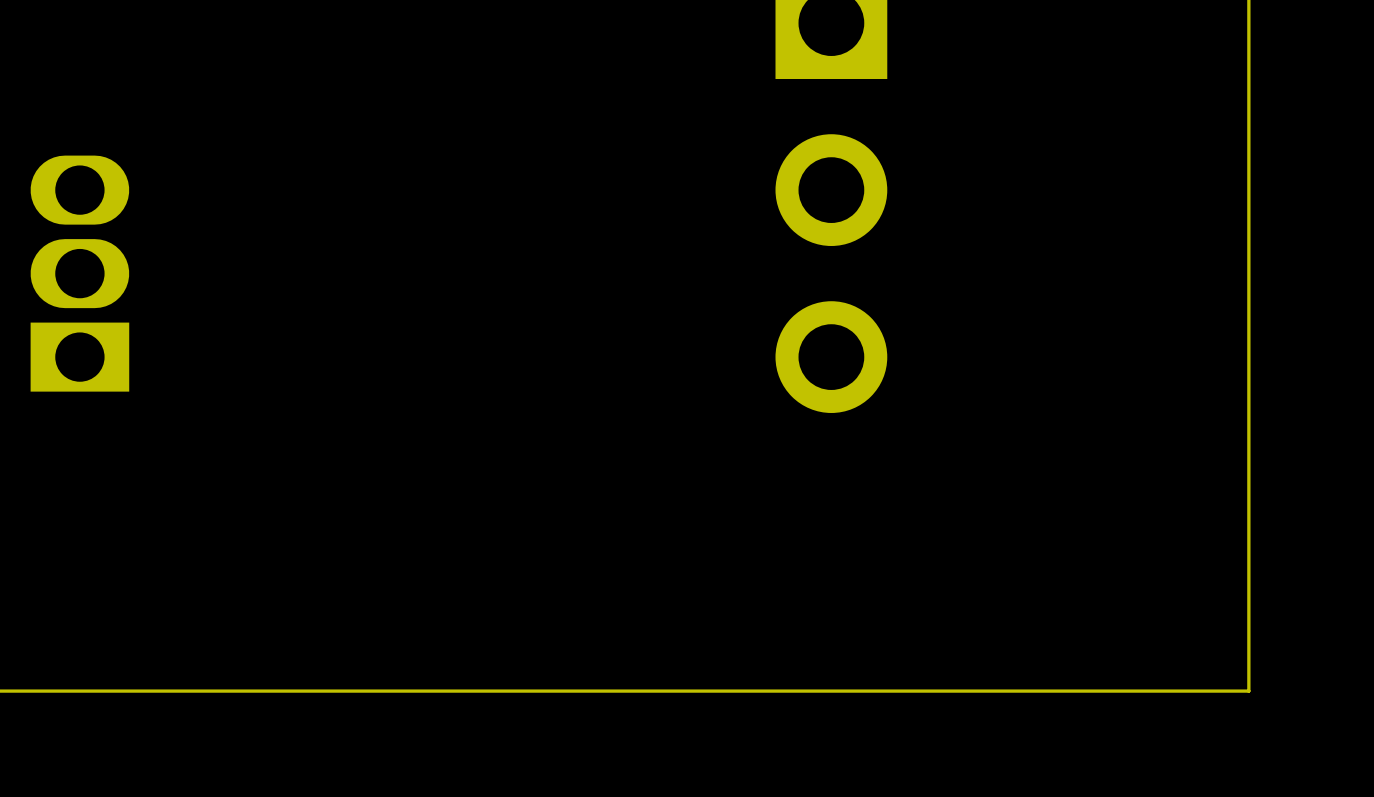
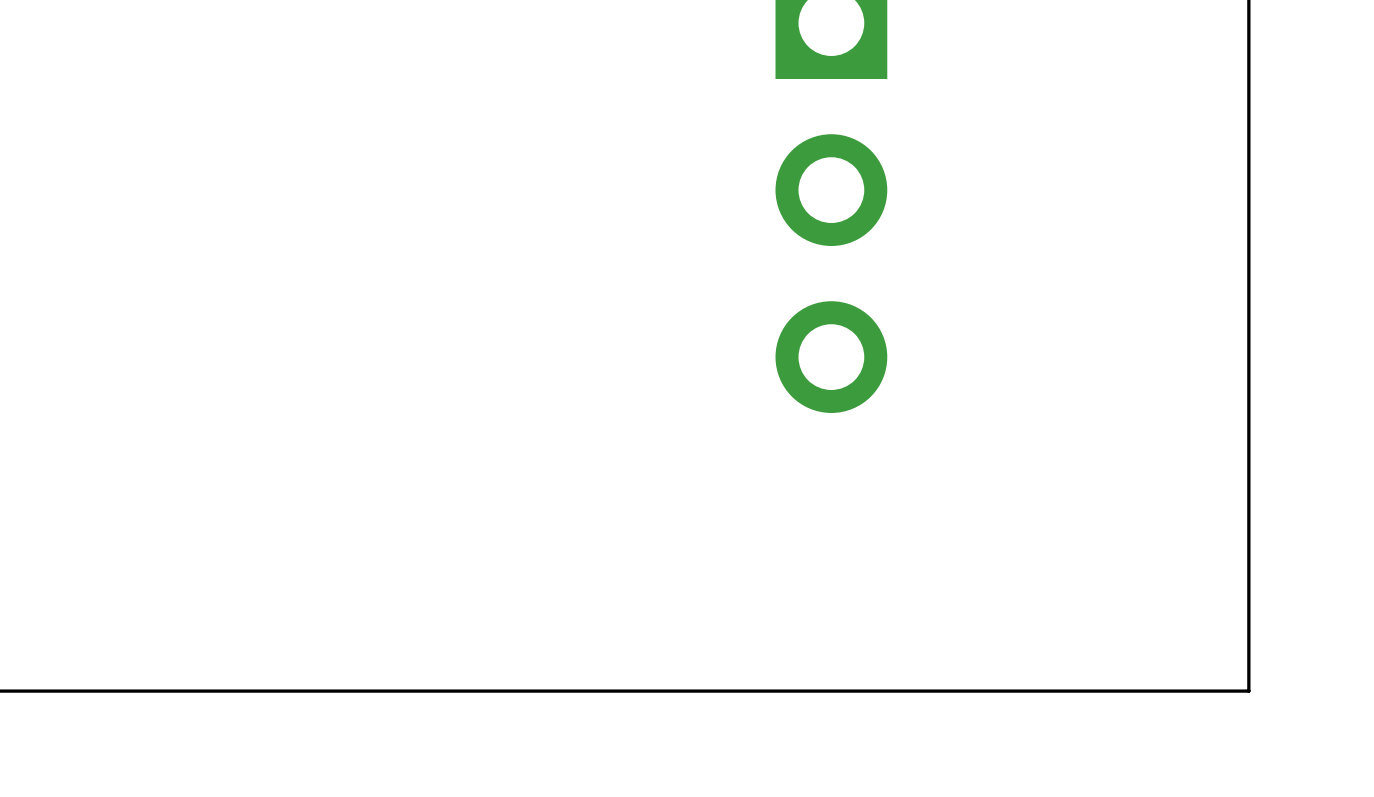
part: (79, 273) -> none

